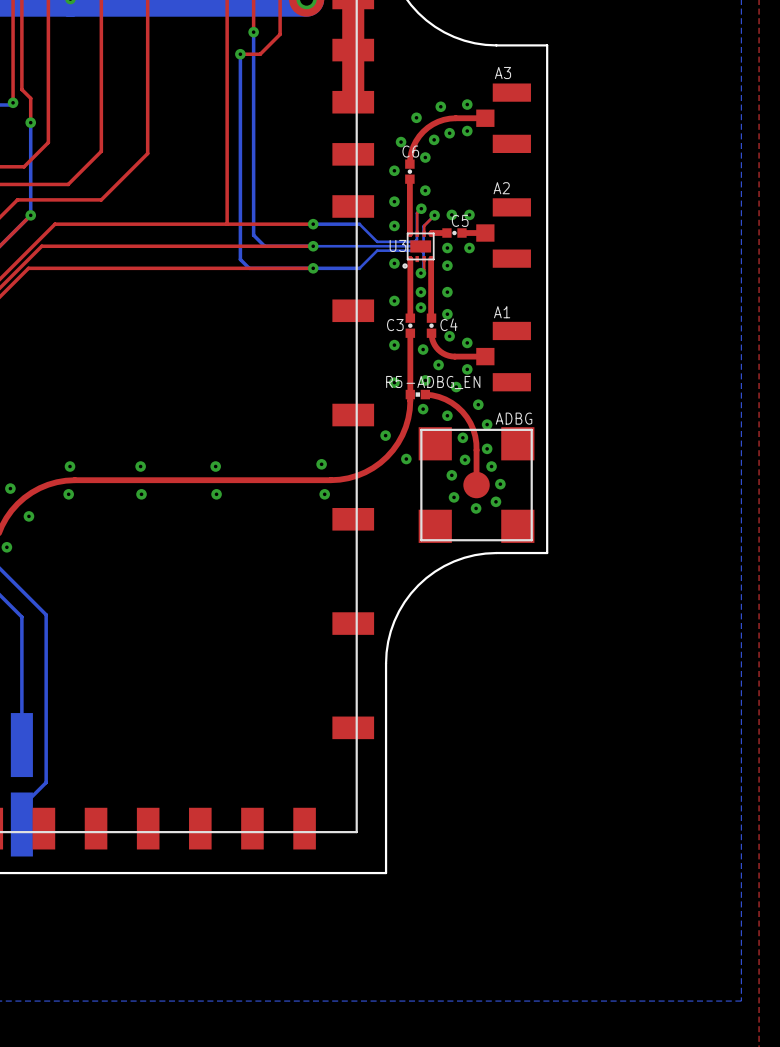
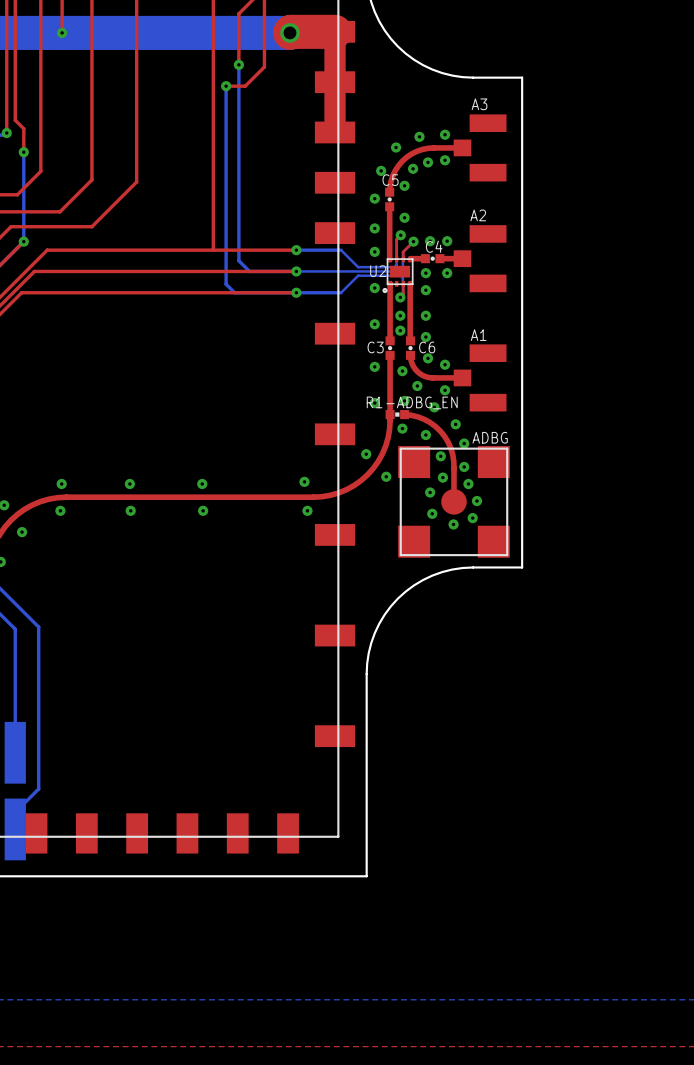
C6 name: C6 (410, 151) -> C5 (390, 180)
C5 name: C5 (460, 220) -> C4 (434, 246)
U3 name: U3 (397, 245) -> U2 (378, 271)
C4 name: C4 (448, 324) -> C6 (427, 347)
R5 name: R5 (394, 381) -> R1 (374, 402)

